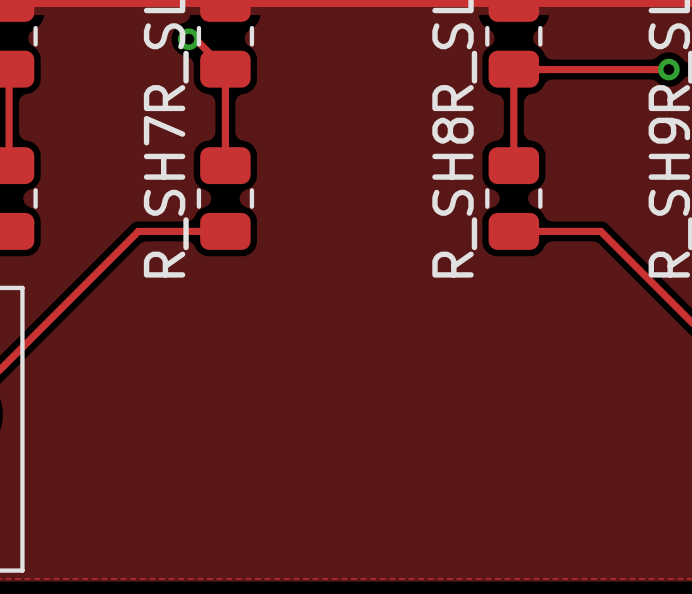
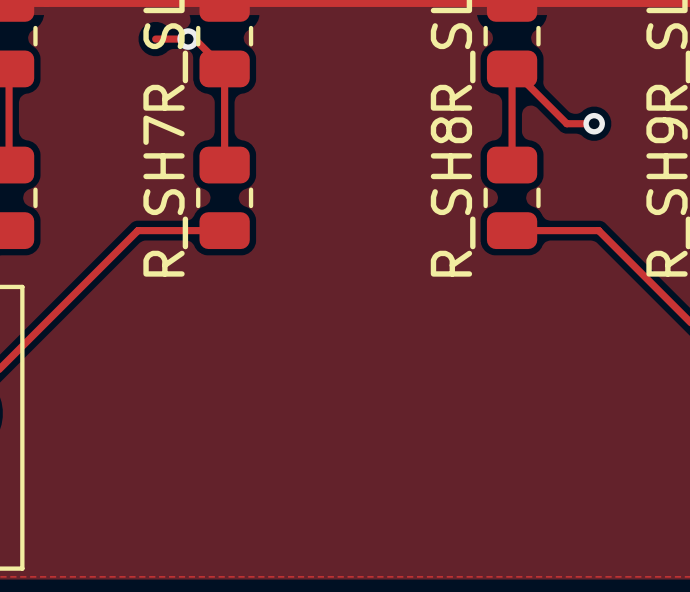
track: none -> (155, 39) (188, 39)
track: (514, 69) (668, 69) -> (512, 69) (566, 123) (594, 123)
via: (668, 69) -> none
via: none -> (594, 123)

